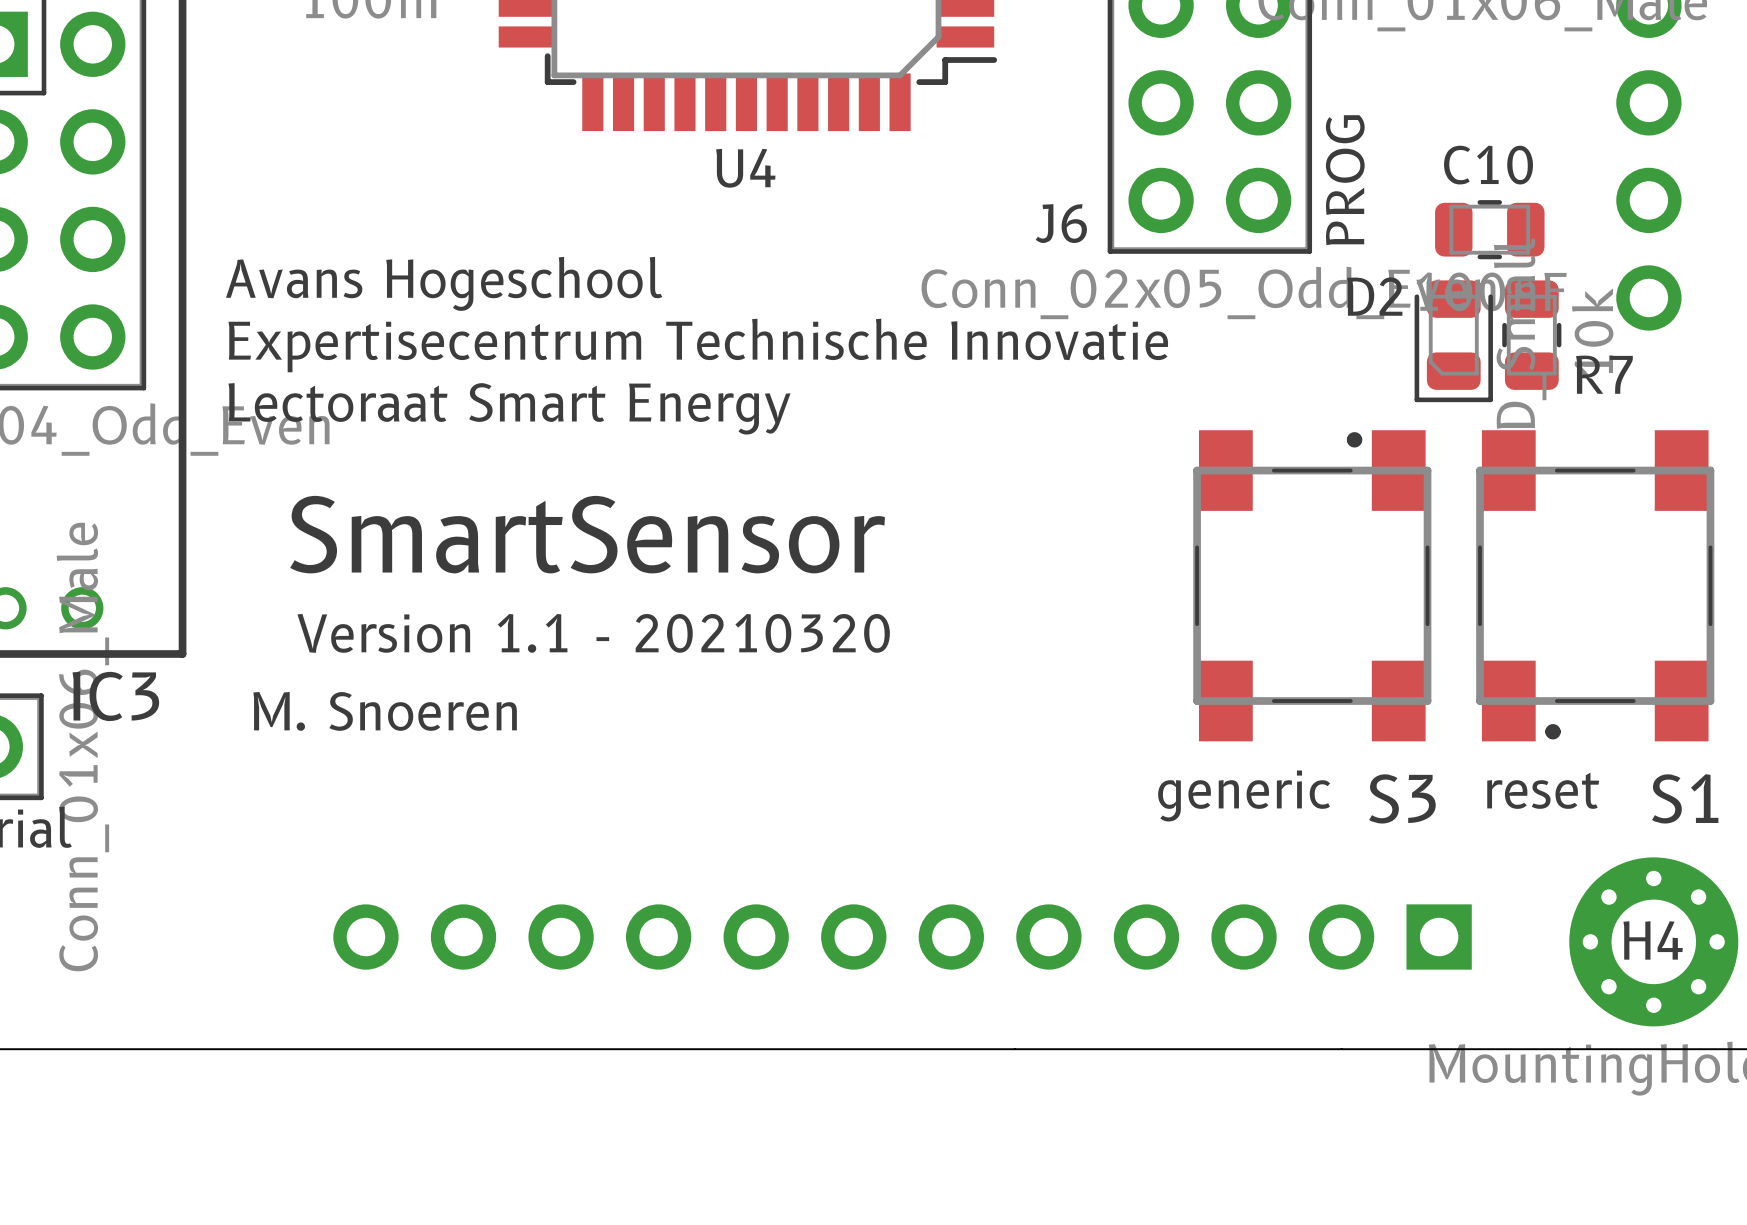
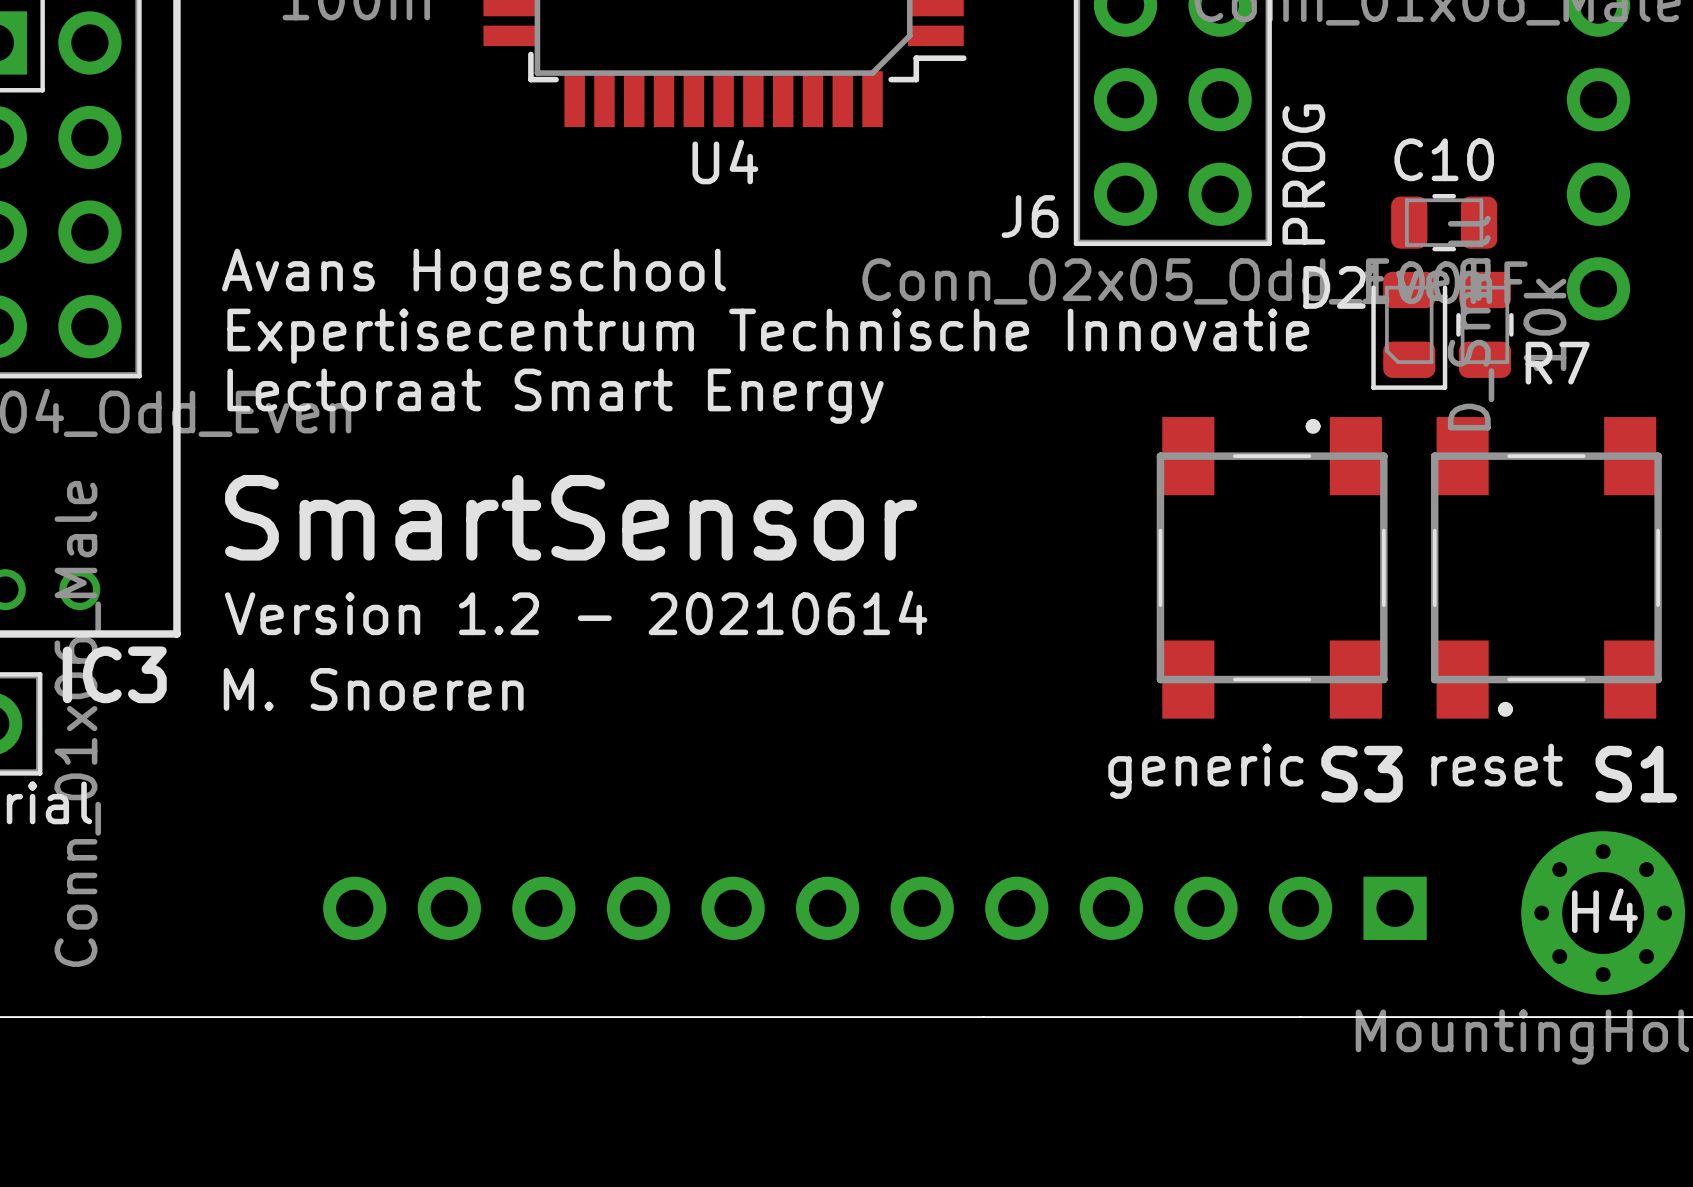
text: Version 1.1 - 20210320 (593, 633) -> Version 1.2 - 20210614 (576, 612)

